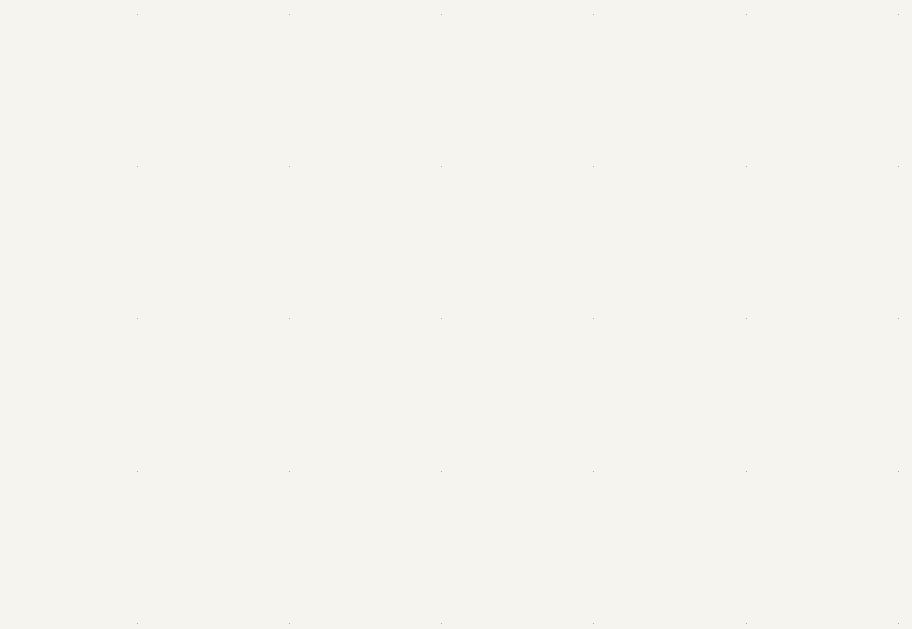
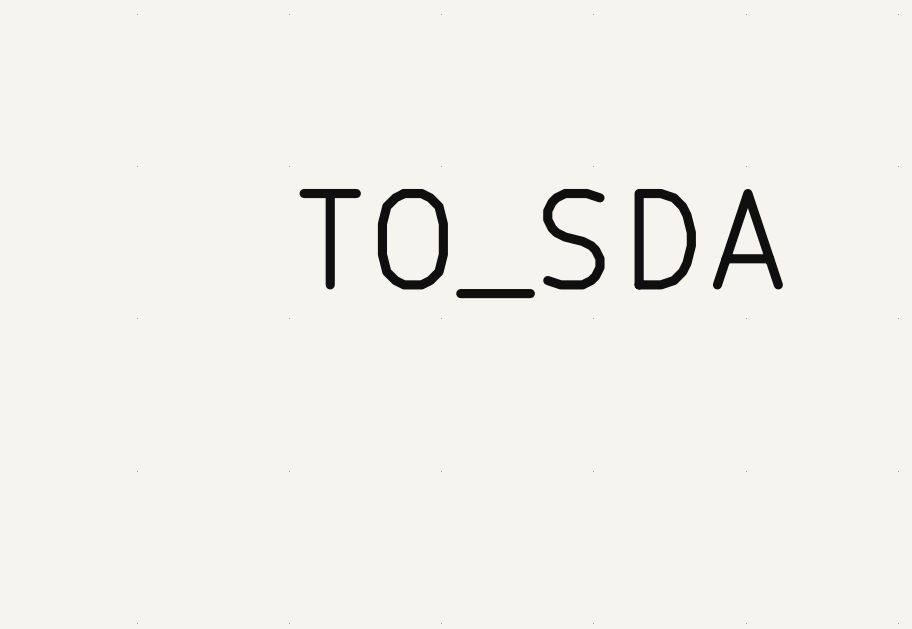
label: none -> TO_SDA (541, 243)

